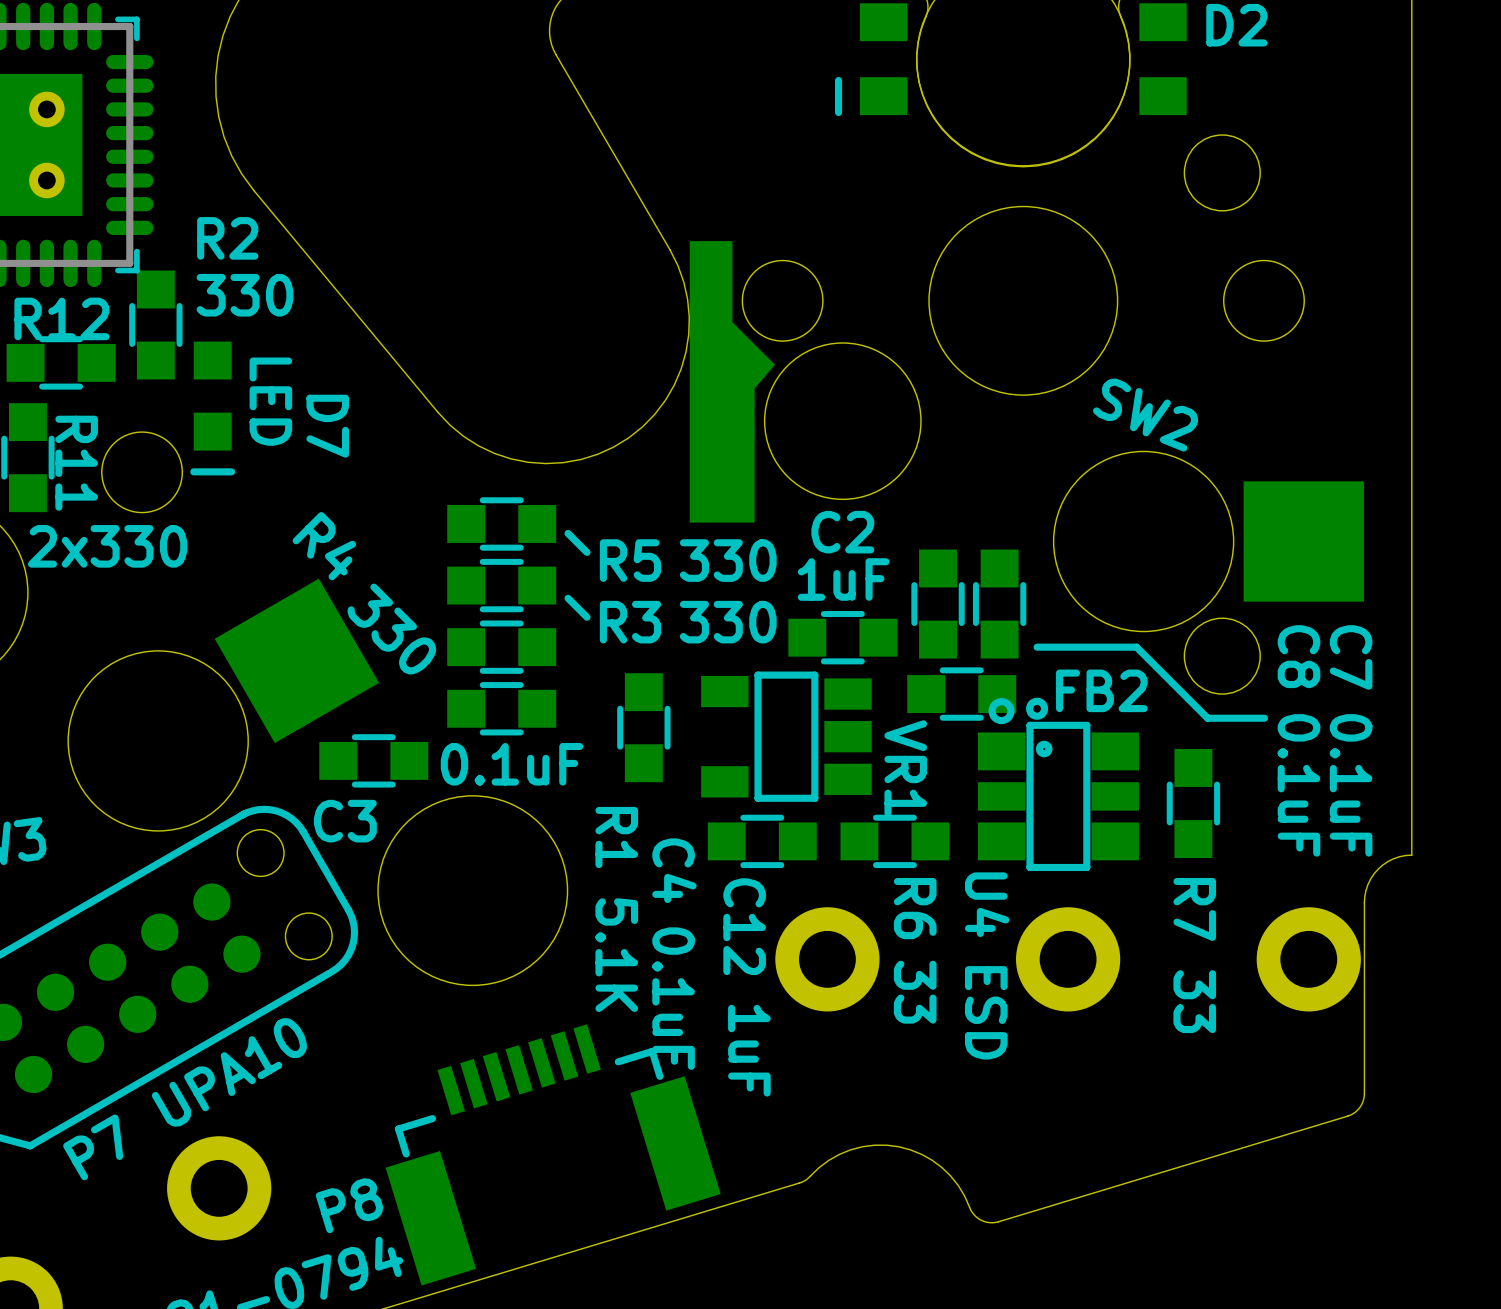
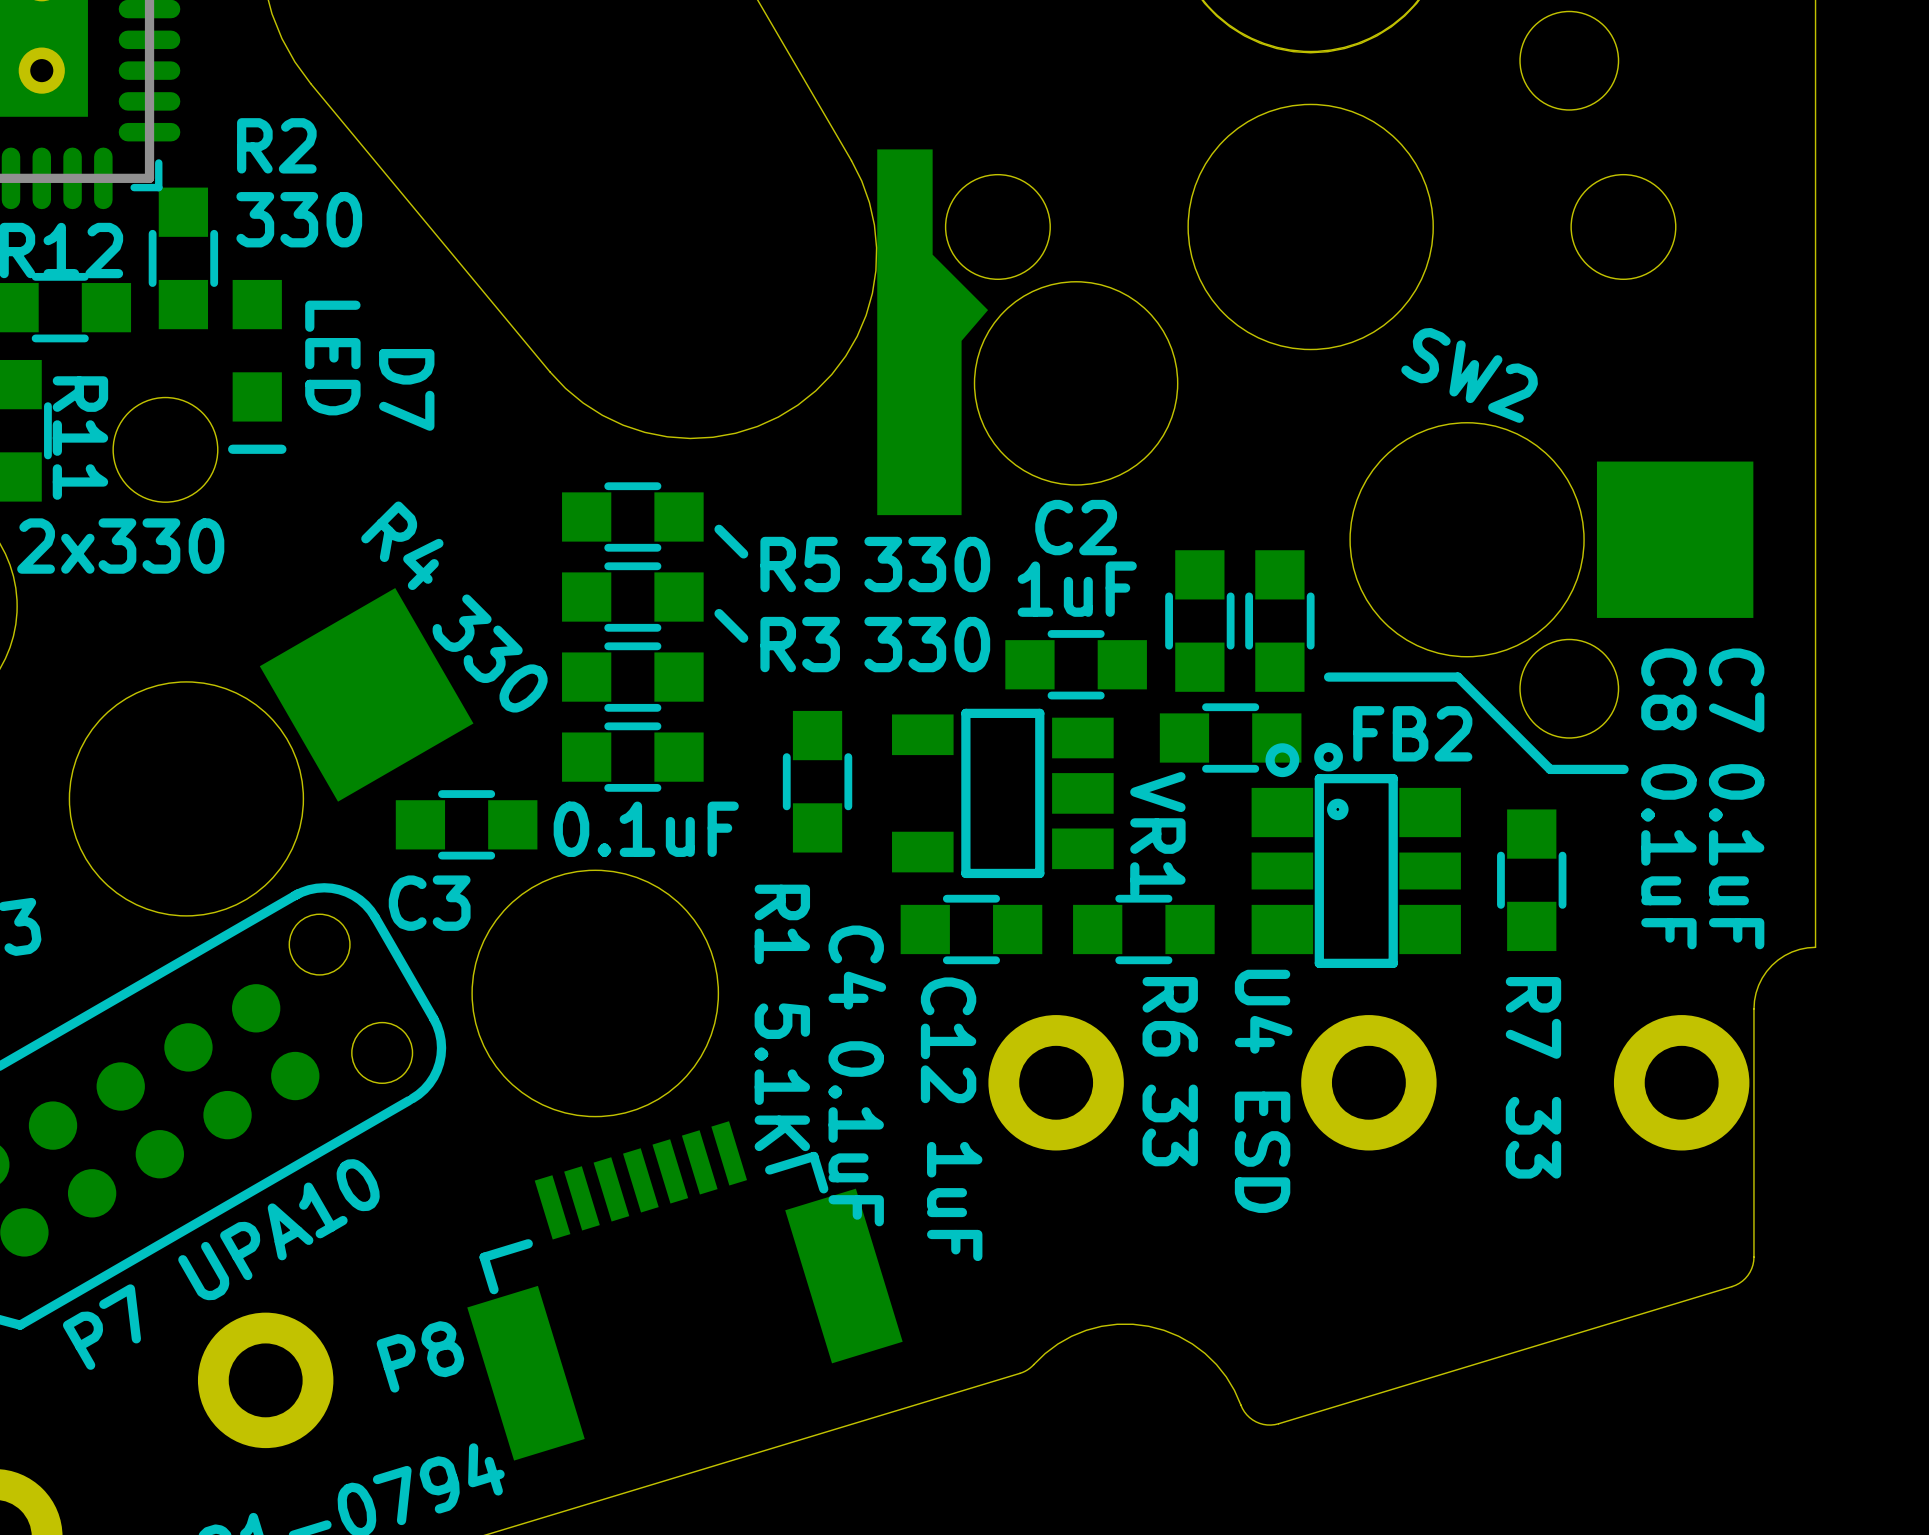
P8 position: (553, 1154) -> (684, 1290)

